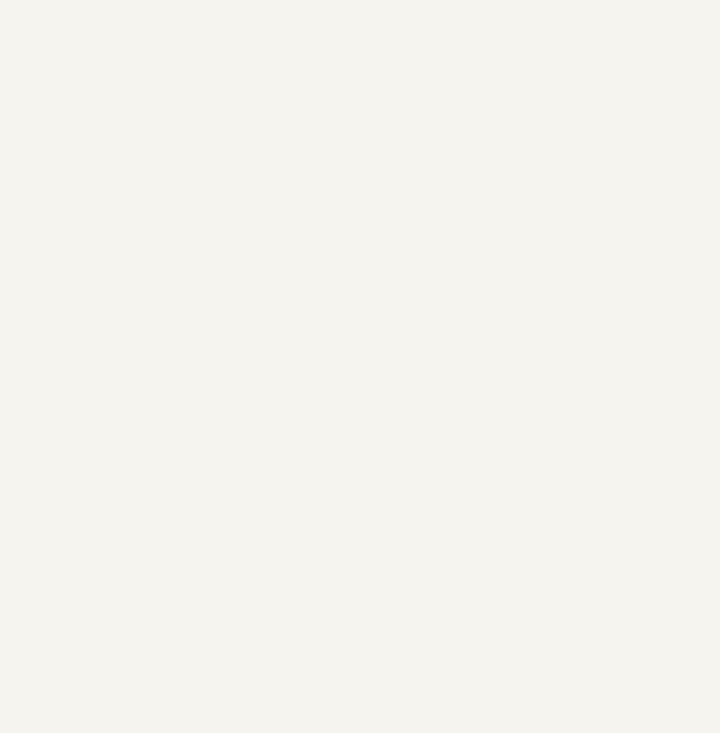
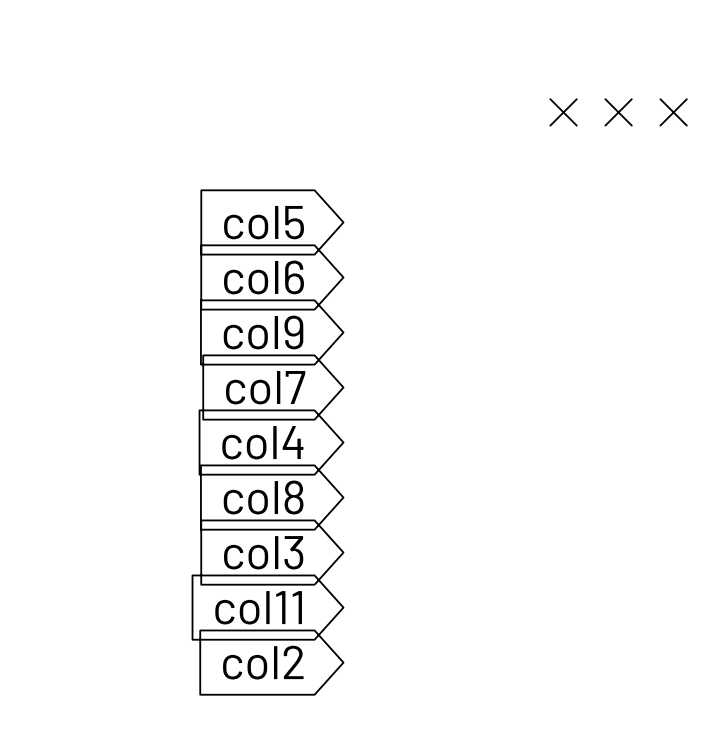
no-connect mark: none -> (563, 112)
no-connect mark: none -> (618, 112)
no-connect mark: none -> (673, 112)
global label: none -> col5 (264, 222)
global label: none -> col6 (264, 277)
global label: none -> col9 (263, 332)
global label: none -> col7 (265, 387)
global label: none -> col4 (262, 442)
global label: none -> col8 (263, 497)
global label: none -> col3 (263, 552)
global label: none -> col11 (258, 607)
global label: none -> col2 (263, 662)

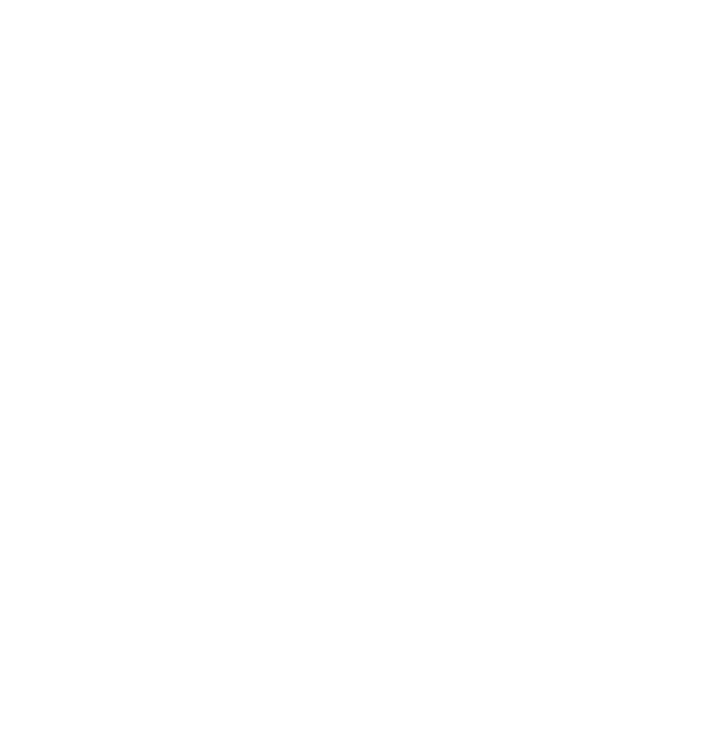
no-connect mark: (563, 112) -> none
no-connect mark: (618, 112) -> none
no-connect mark: (673, 112) -> none
global label: col5 (264, 222) -> none
global label: col6 (264, 277) -> none
global label: col9 (263, 332) -> none
global label: col7 (265, 387) -> none
global label: col4 (262, 442) -> none
global label: col8 (263, 497) -> none
global label: col3 (263, 552) -> none
global label: col11 (258, 607) -> none
global label: col2 (263, 662) -> none

